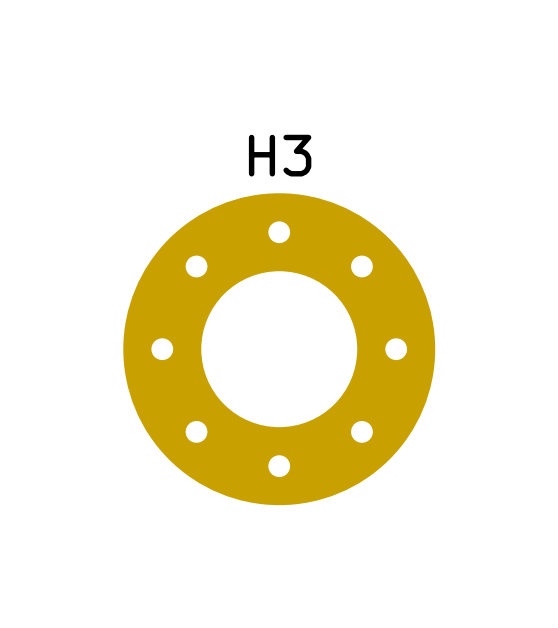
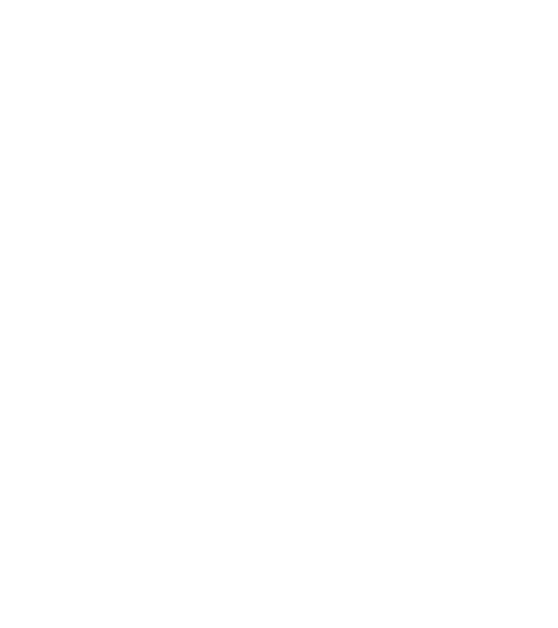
H3: (279, 349) -> none

